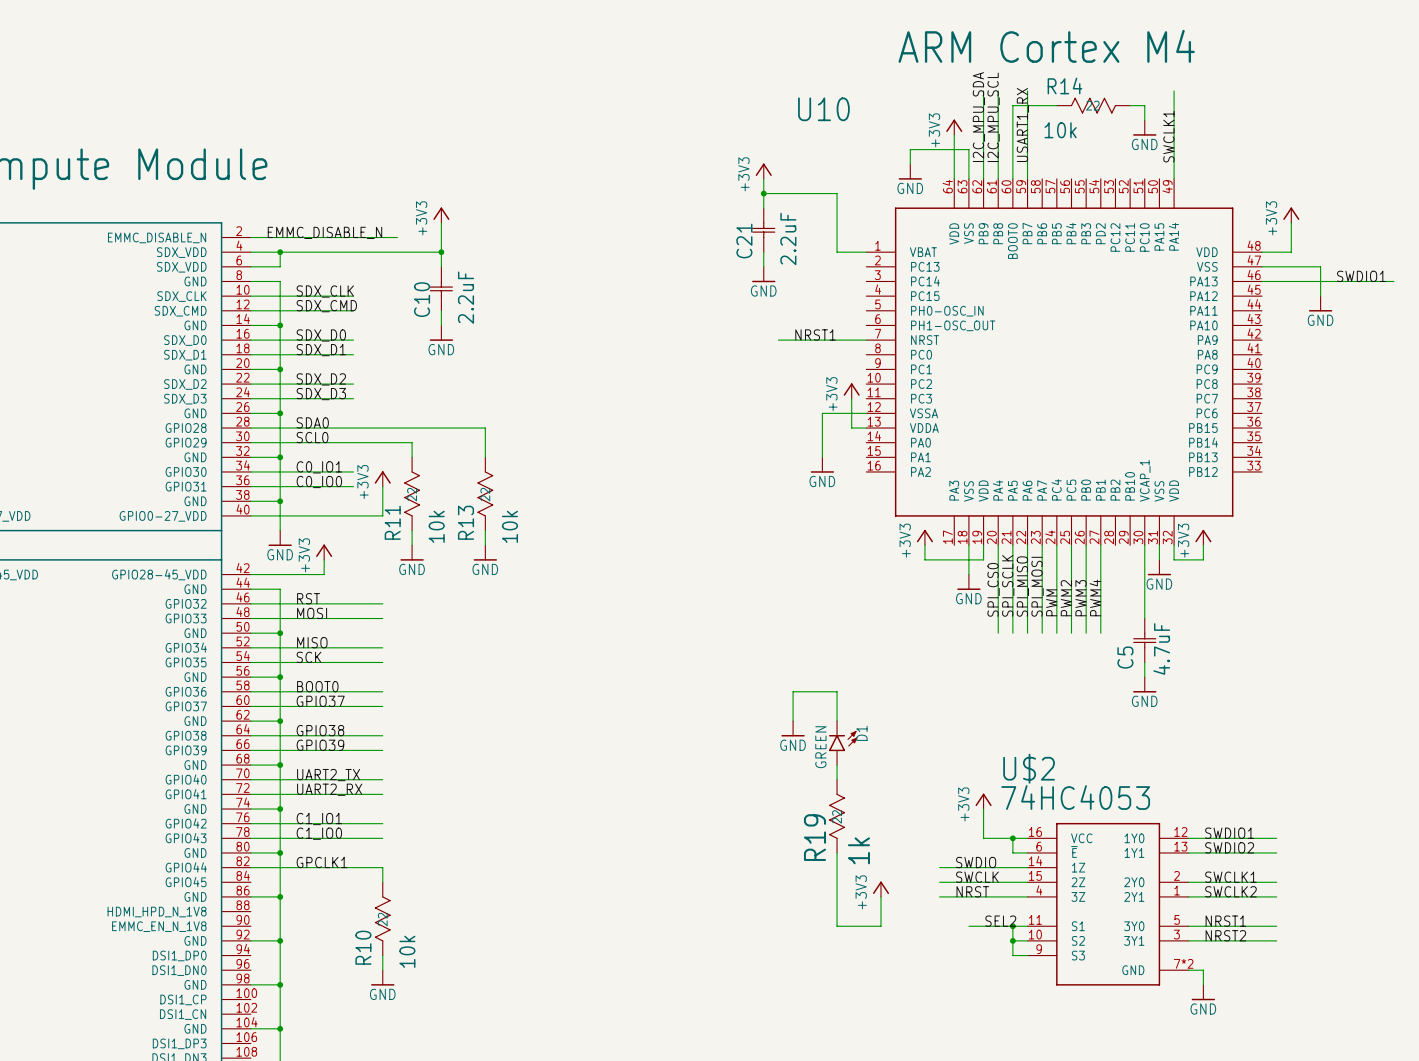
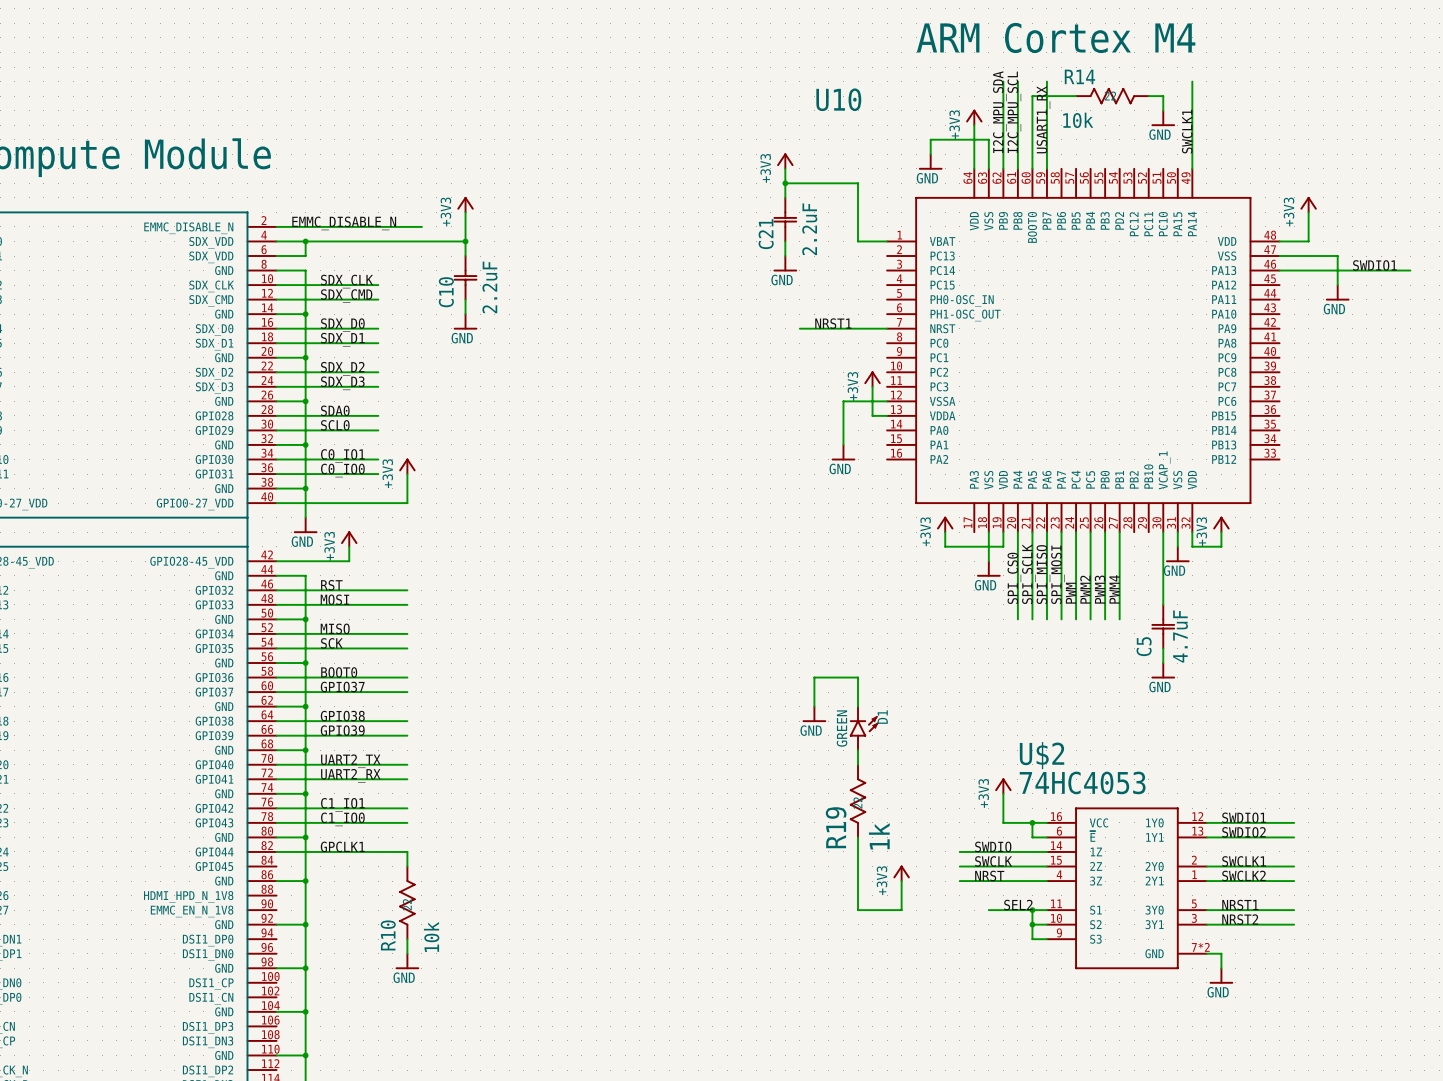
wire: (353, 428) (485, 428) (485, 457) -> none
wire: (353, 442) (412, 442) (412, 457) -> none
R11: 10k (412, 493) -> none
R13: 10k (485, 493) -> none
wire: (412, 530) (412, 545) -> none
wire: (485, 530) (485, 545) -> none
power symbol: GND (412, 552) -> none
power symbol: GND (485, 552) -> none

